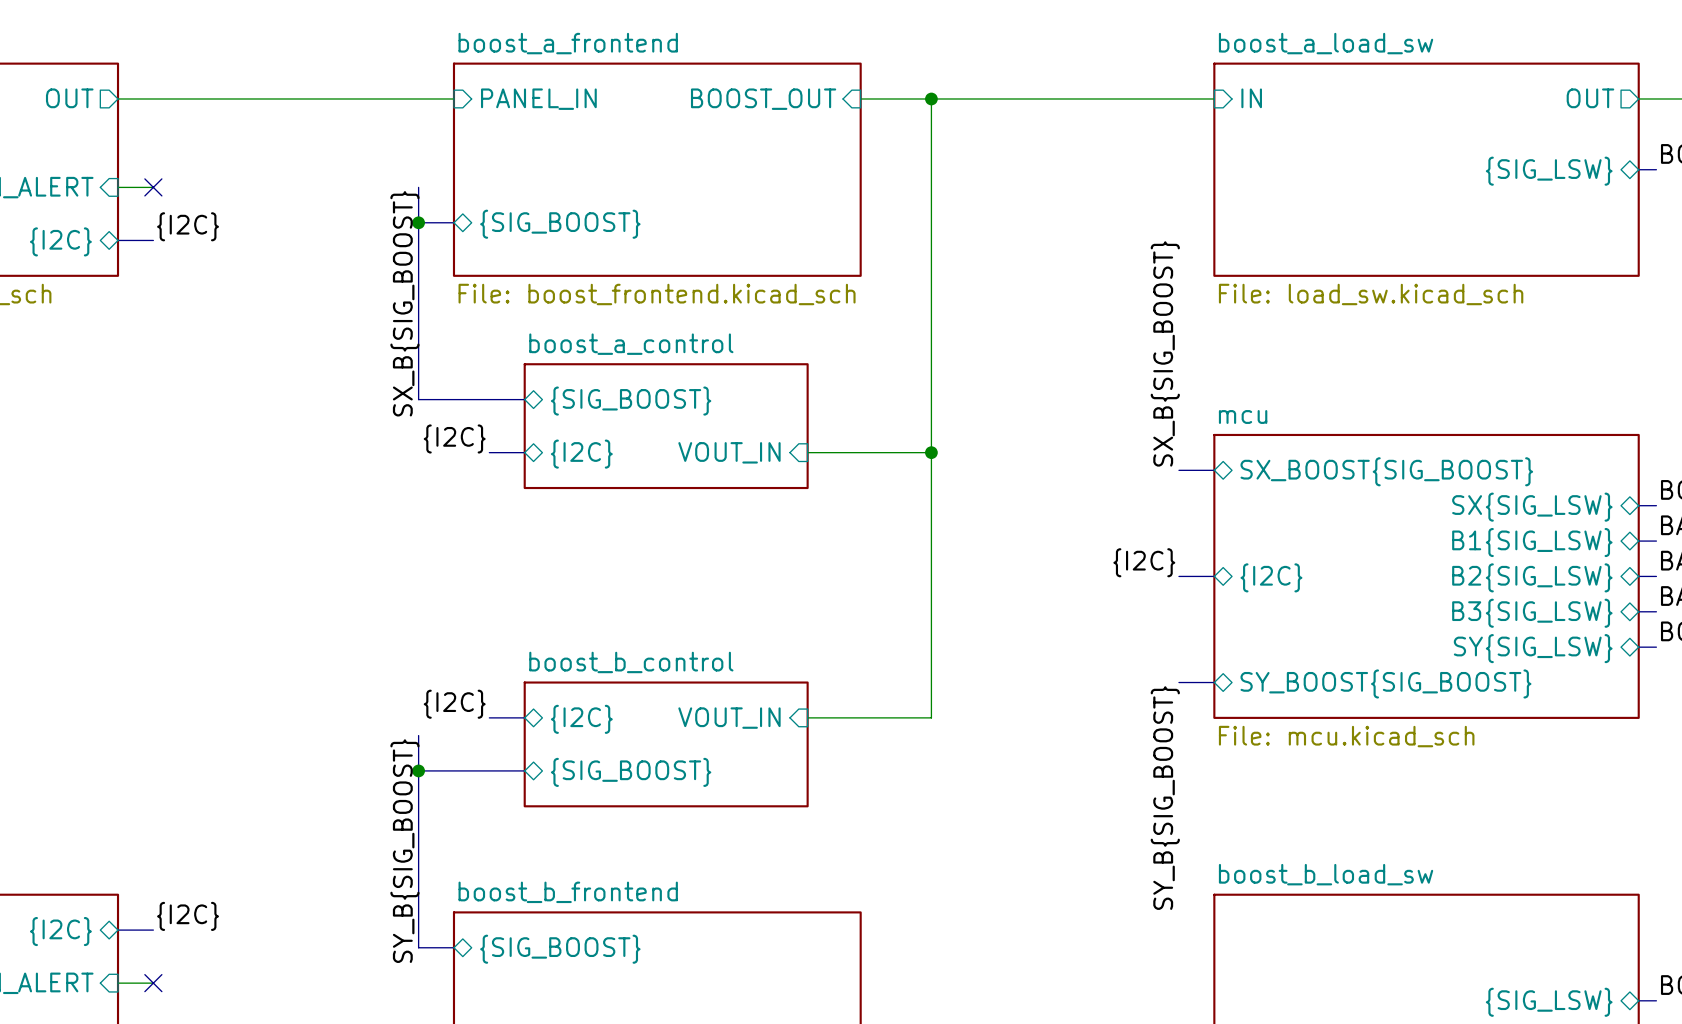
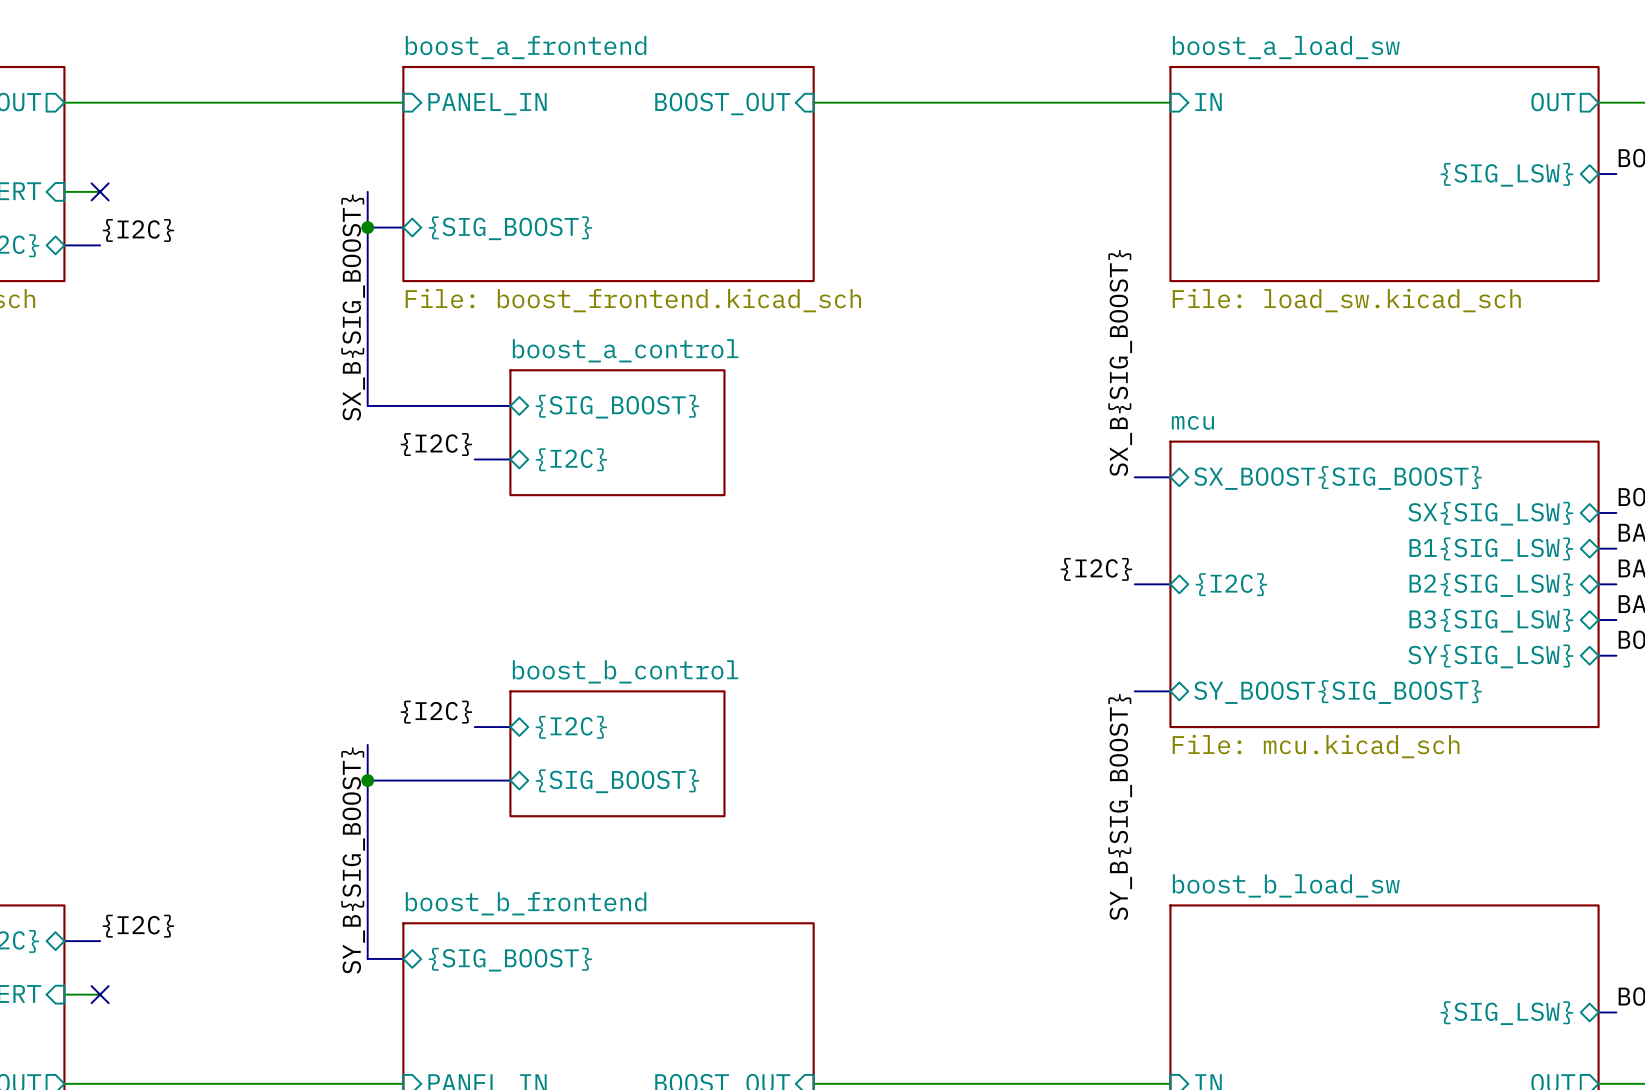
wire: (931, 98) (931, 717) (807, 717) -> none
junction: (931, 98) -> none
sheet boost_a_control name position: boost_a_control (631, 344) -> boost_a_control (625, 350)
sheet boost_a_control shape: [523, 363, 809, 490] -> [509, 369, 726, 497]
bus: none -> (474, 405) (510, 405)
sheet pin position: {SIG_BOOST} (631, 401) -> {SIG_BOOST} (617, 406)
label position: {I2C} (454, 438) -> {I2C} (436, 444)
bus: (489, 452) (524, 452) -> (510, 459) (474, 459)
sheet pin: VOUT_IN (729, 452) -> none
wire: (807, 452) (931, 452) -> none
junction: (931, 452) -> none
sheet pin position: {I2C} (581, 454) -> {I2C} (571, 459)
sheet boost_b_control name position: boost_b_control (631, 662) -> boost_b_control (625, 671)
sheet boost_b_control shape: [523, 681, 809, 808] -> [509, 690, 726, 818]
label position: {I2C} (454, 704) -> {I2C} (436, 712)
bus: (489, 717) (524, 717) -> (510, 727) (474, 727)
sheet pin: VOUT_IN (729, 718) -> none
sheet pin position: {I2C} (581, 719) -> {I2C} (571, 727)
bus: none -> (474, 780) (510, 780)
sheet pin position: {SIG_BOOST} (631, 772) -> {SIG_BOOST} (617, 781)

